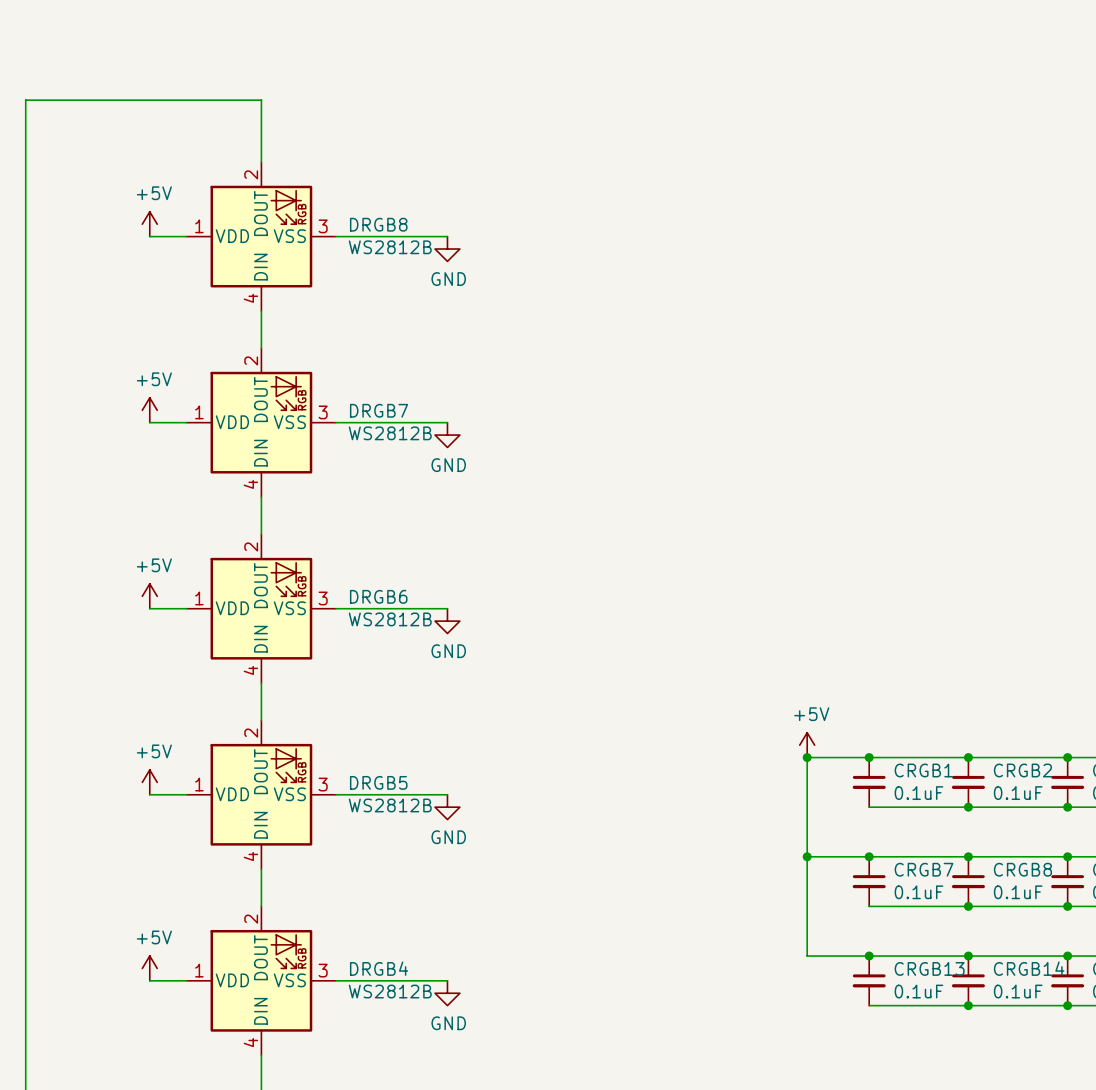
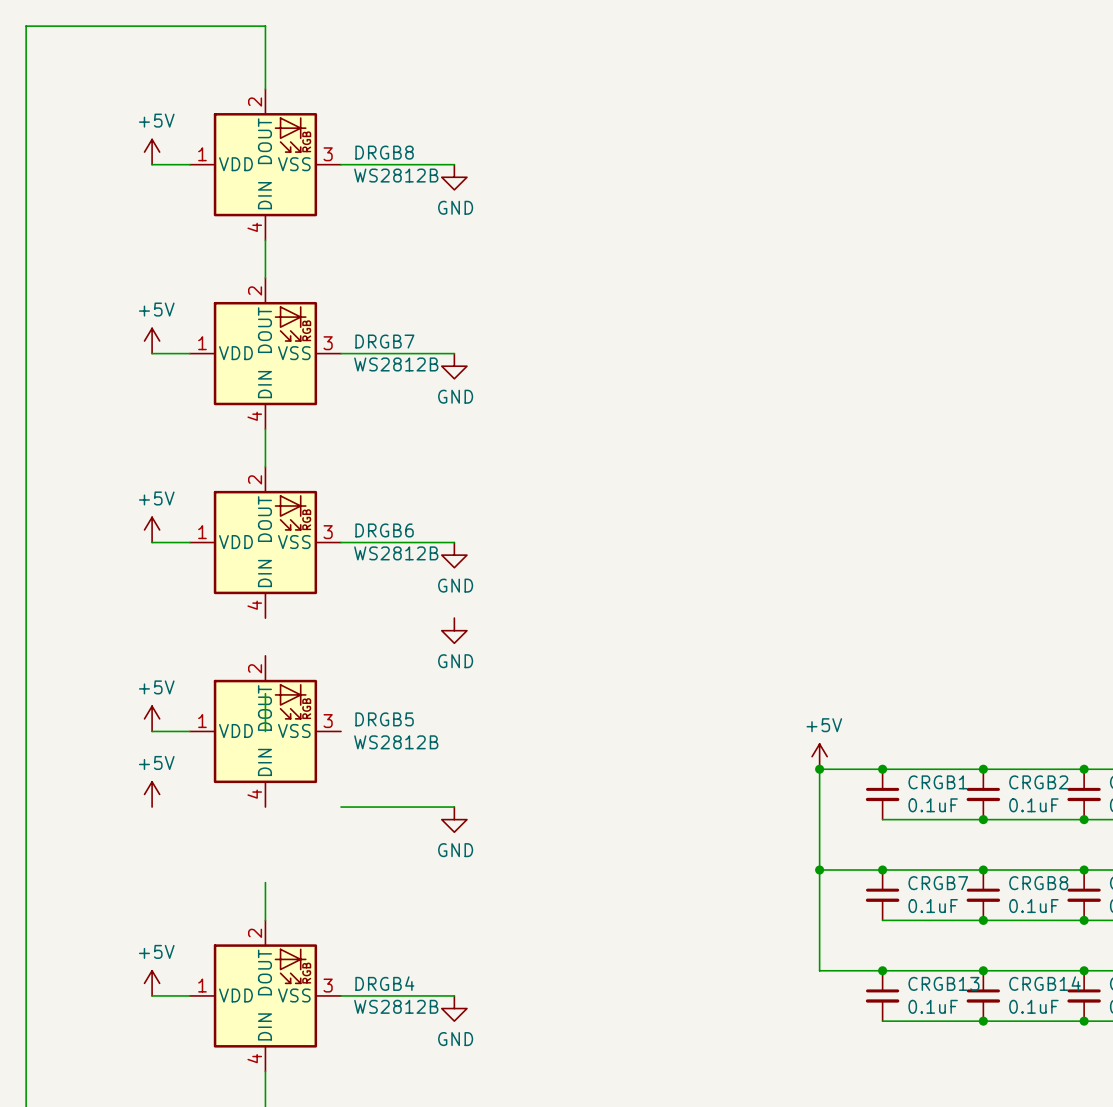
wire: (25, 100) (261, 100) (261, 162) -> (26, 101) (26, 26) (265, 26) (265, 89)
power symbol: none -> +5V (152, 152)
power symbol: none -> GND (454, 177)
power symbol: +5V (149, 224) -> none
wire: (149, 236) (186, 236) -> (152, 164) (189, 164)
DRGB8 position: (261, 236) -> (265, 164)
wire: (335, 236) (447, 236) -> (341, 164) (454, 164)
power symbol: GND (447, 249) -> none
power symbol: none -> +5V (152, 341)
power symbol: none -> GND (454, 366)
power symbol: +5V (149, 410) -> none
wire: (149, 422) (186, 422) -> (152, 353) (189, 353)
DRGB7 position: (261, 422) -> (265, 353)
wire: (335, 422) (447, 422) -> (341, 353) (454, 353)
power symbol: GND (447, 435) -> none
power symbol: none -> +5V (152, 529)
power symbol: none -> GND (454, 555)
power symbol: +5V (149, 596) -> none
wire: (149, 608) (186, 608) -> (152, 542) (189, 542)
DRGB6 position: (261, 608) -> (265, 542)
wire: (335, 608) (447, 608) -> (341, 542) (454, 542)
power symbol: none -> +5V (152, 718)
wire: (149, 794) (186, 794) -> (152, 731) (189, 731)
DRGB5 position: (261, 794) -> (265, 731)

